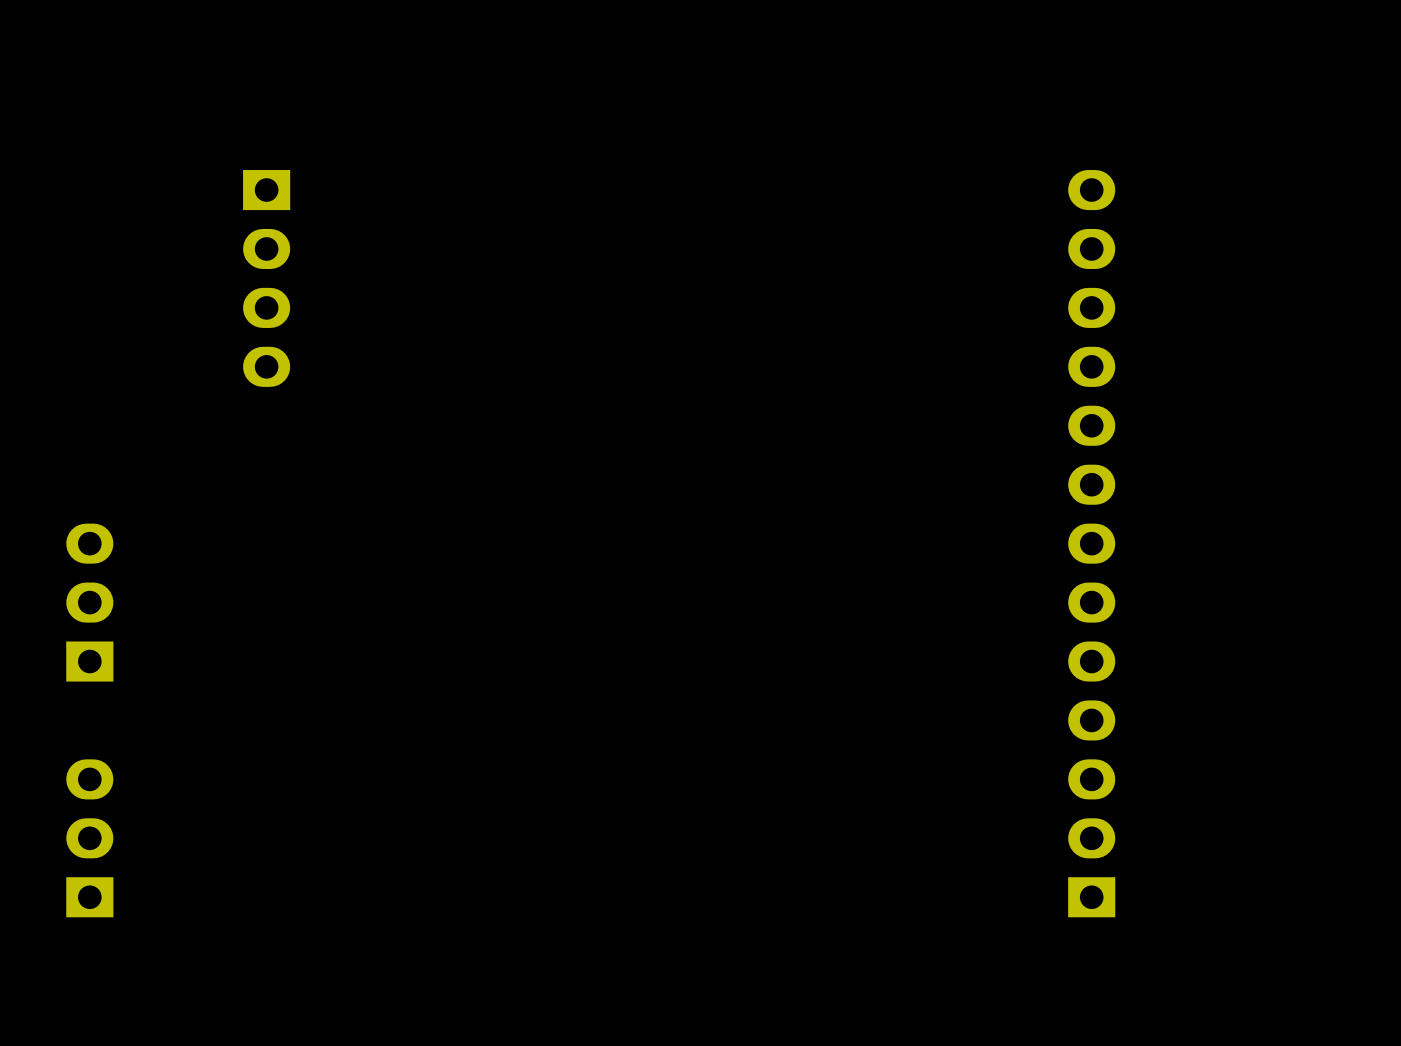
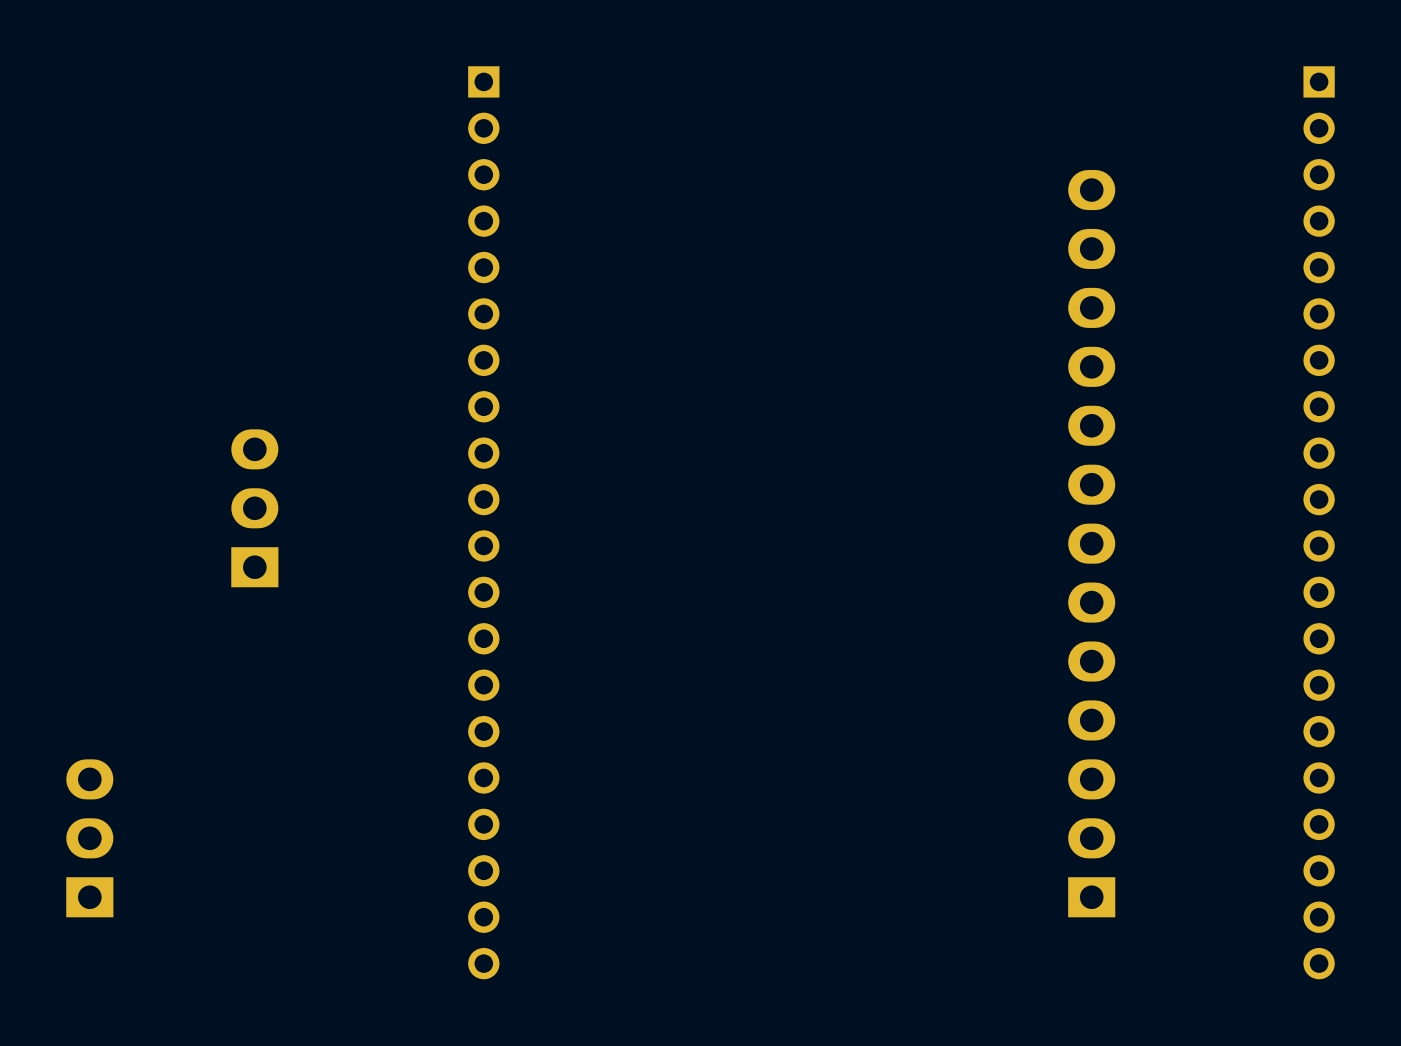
part: (266, 278) -> none
part: none -> (483, 522)
part: none -> (1319, 522)
part position: (89, 602) -> (254, 508)

